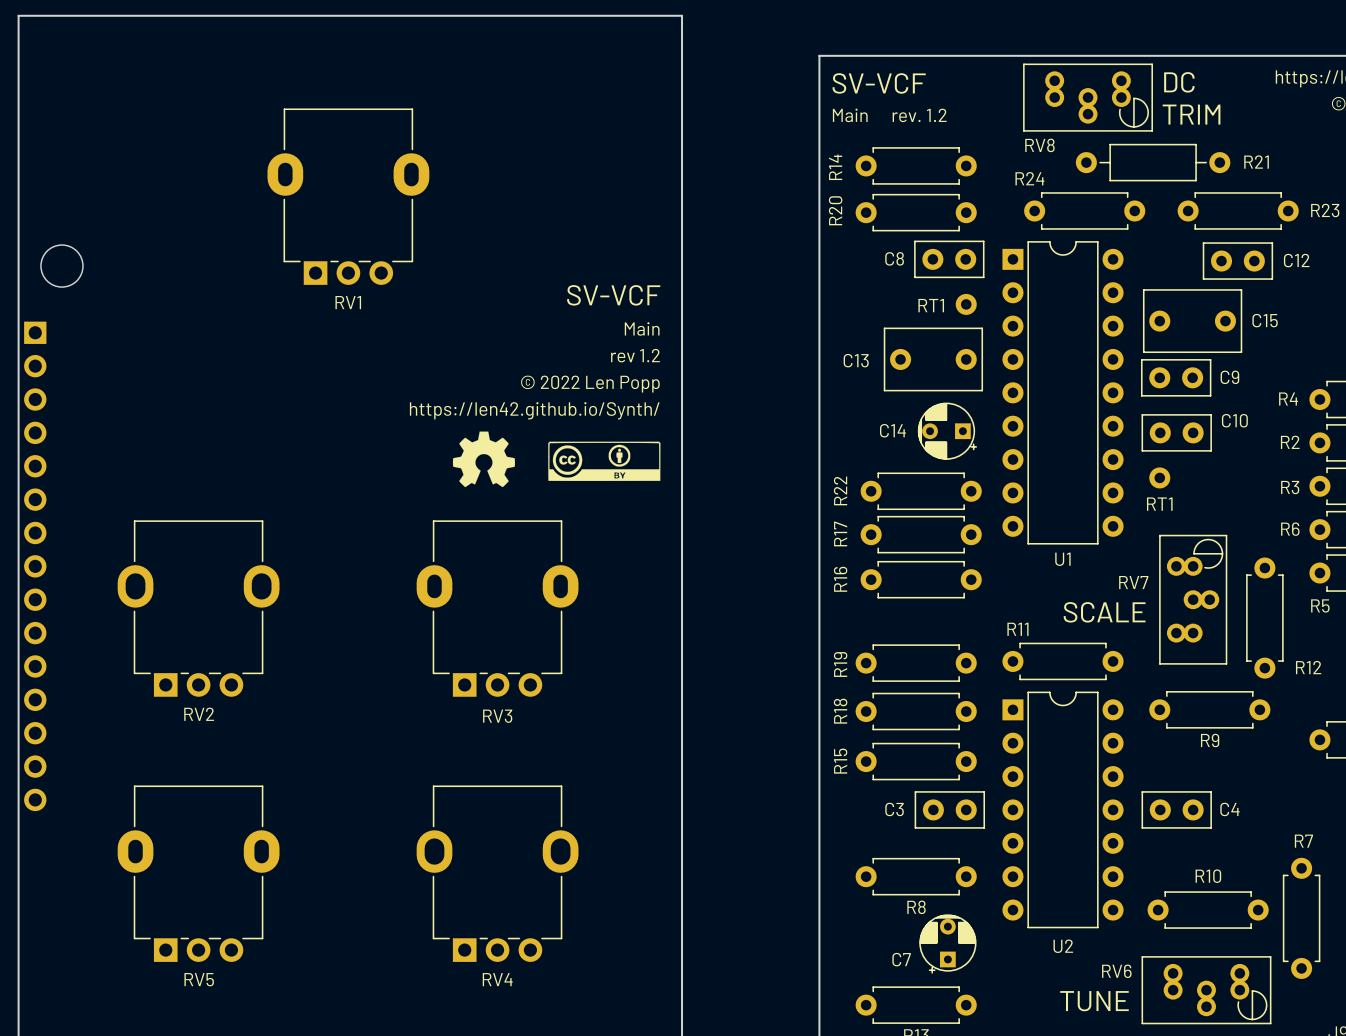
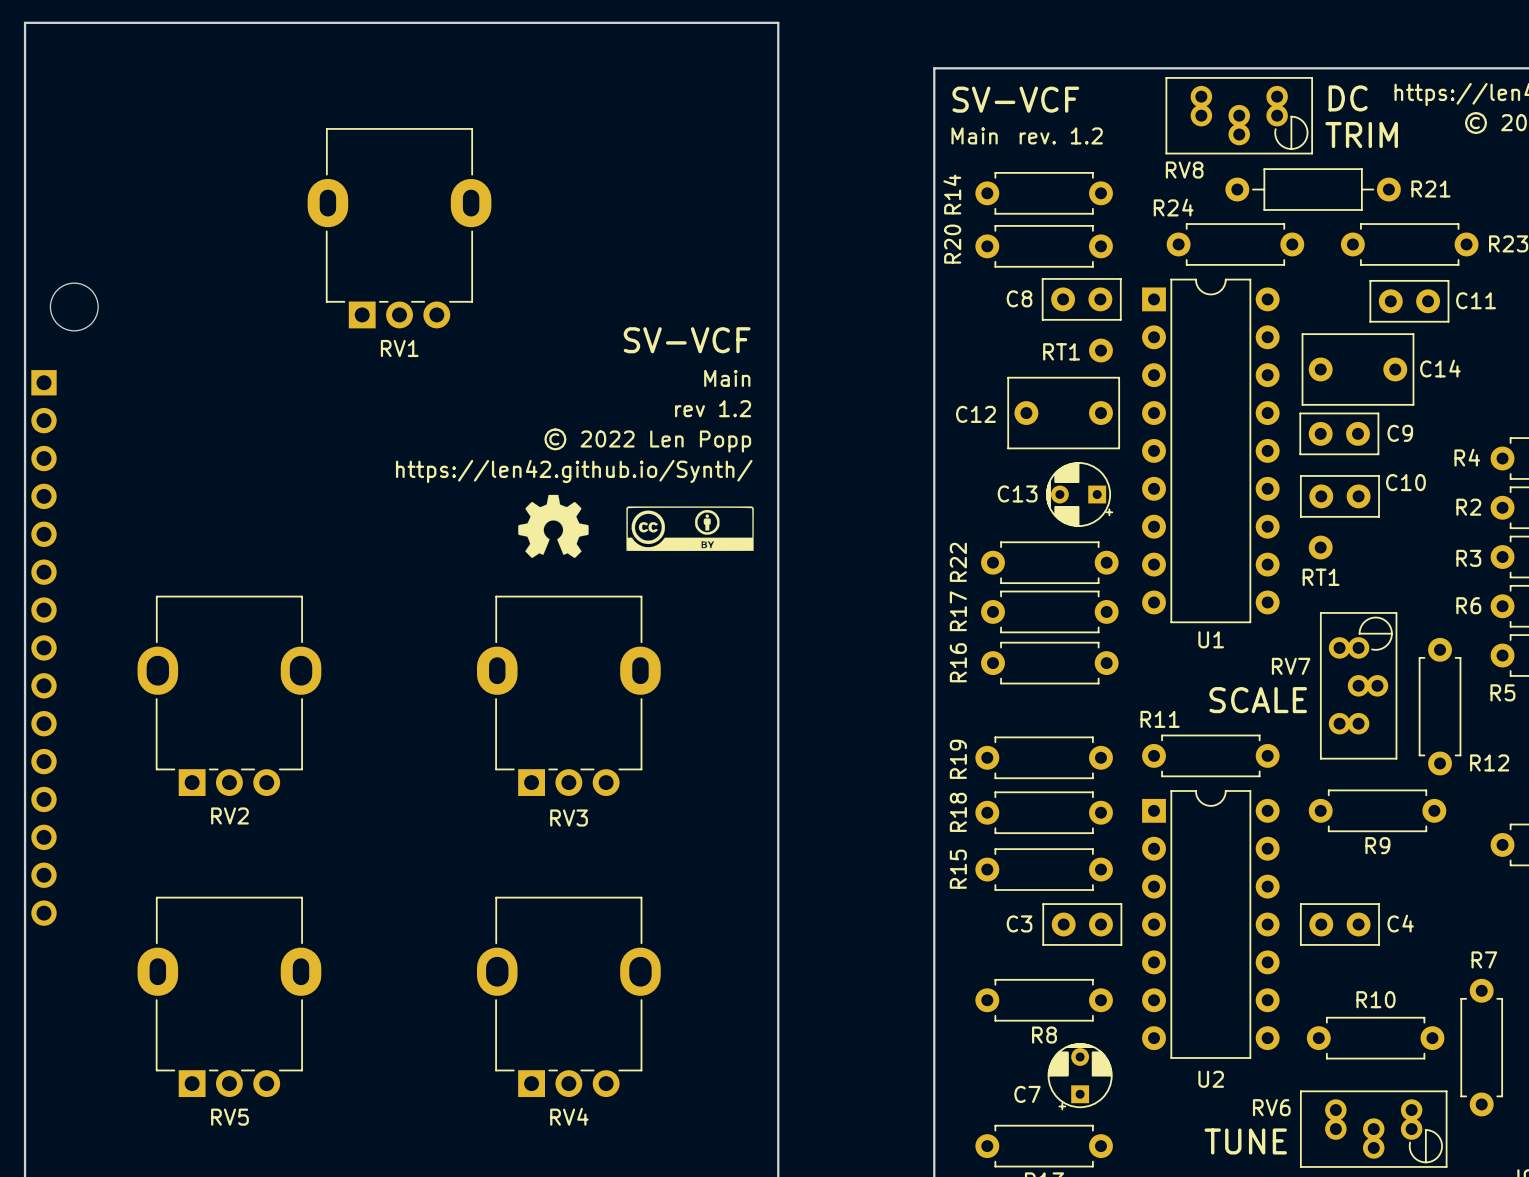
C12 name: C12 (1296, 260) -> C11 (1476, 300)
C15 name: C15 (1265, 320) -> C14 (1440, 368)
C13 name: C13 (856, 360) -> C12 (975, 414)
C14 name: C14 (892, 430) -> C13 (1017, 493)

